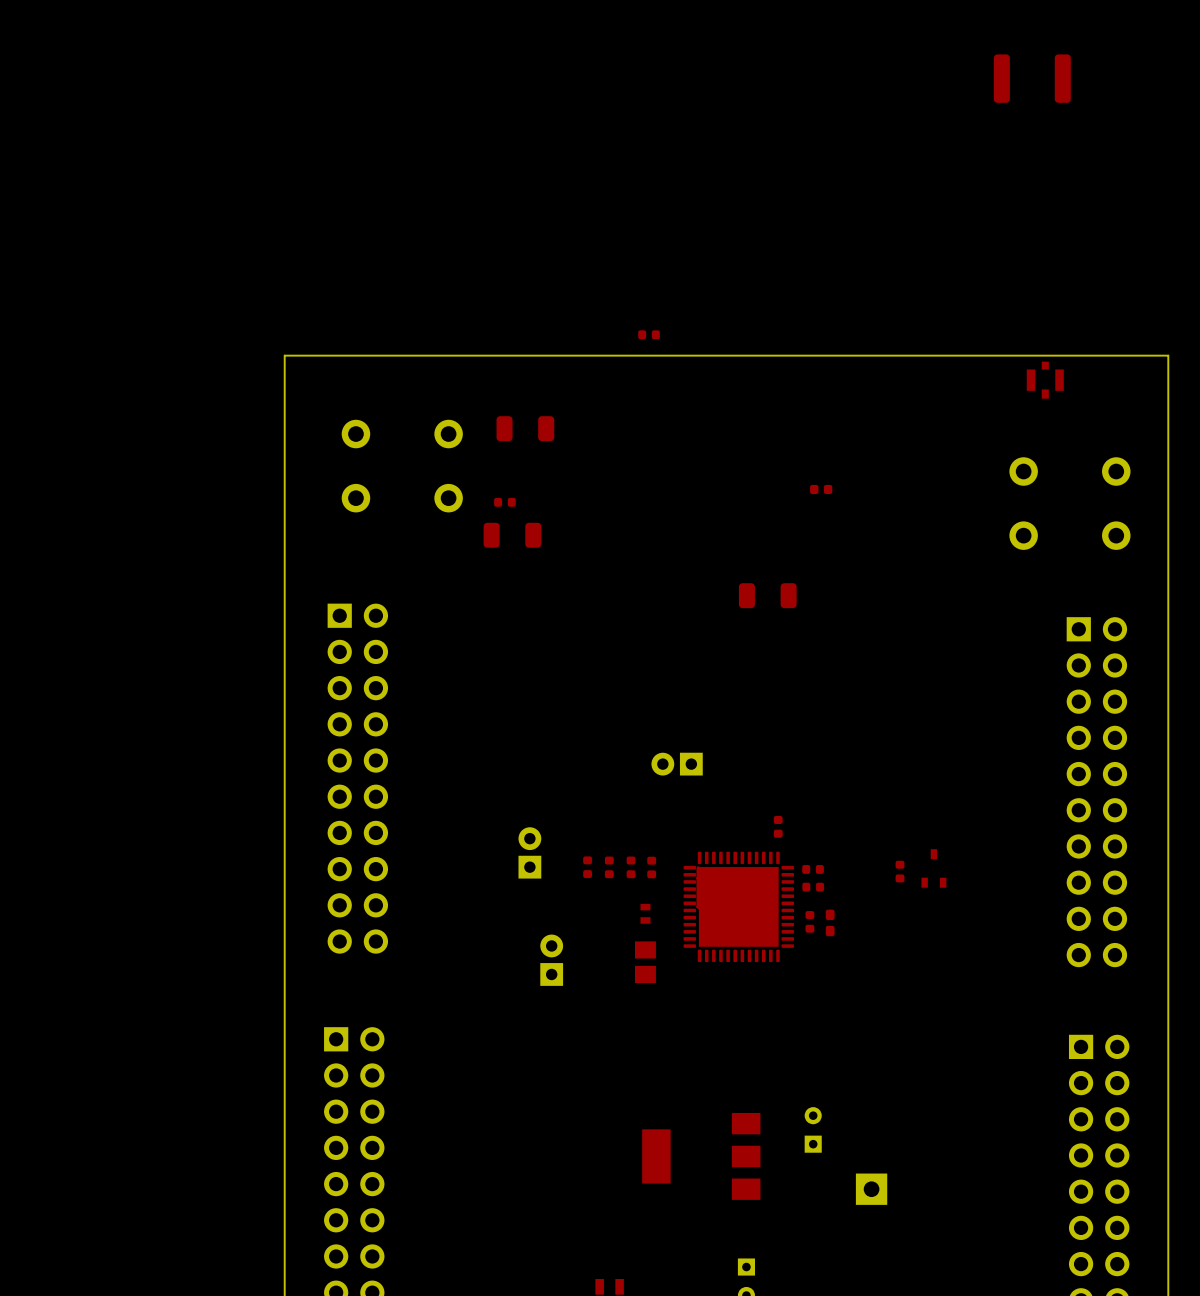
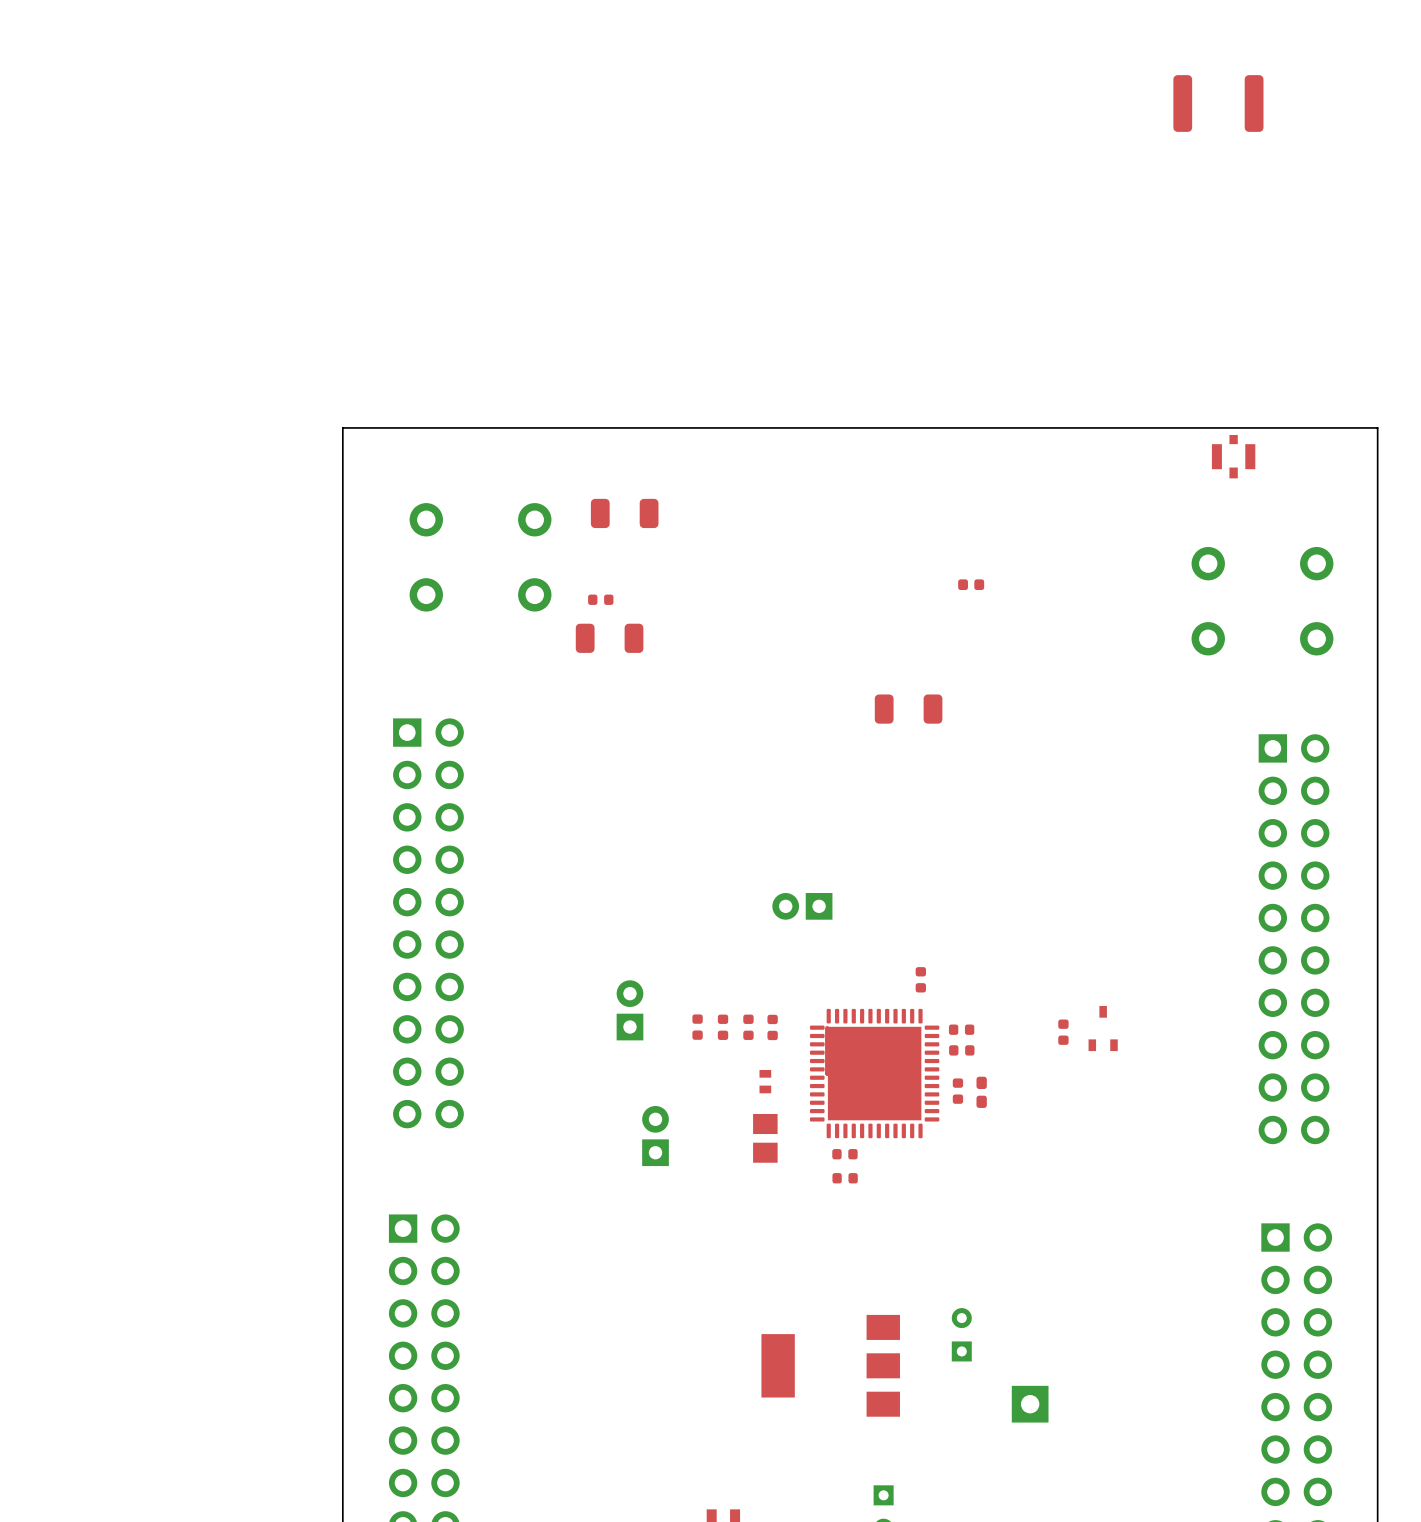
part: (649, 334) -> none
part: none -> (844, 1154)
part: none -> (845, 1178)

